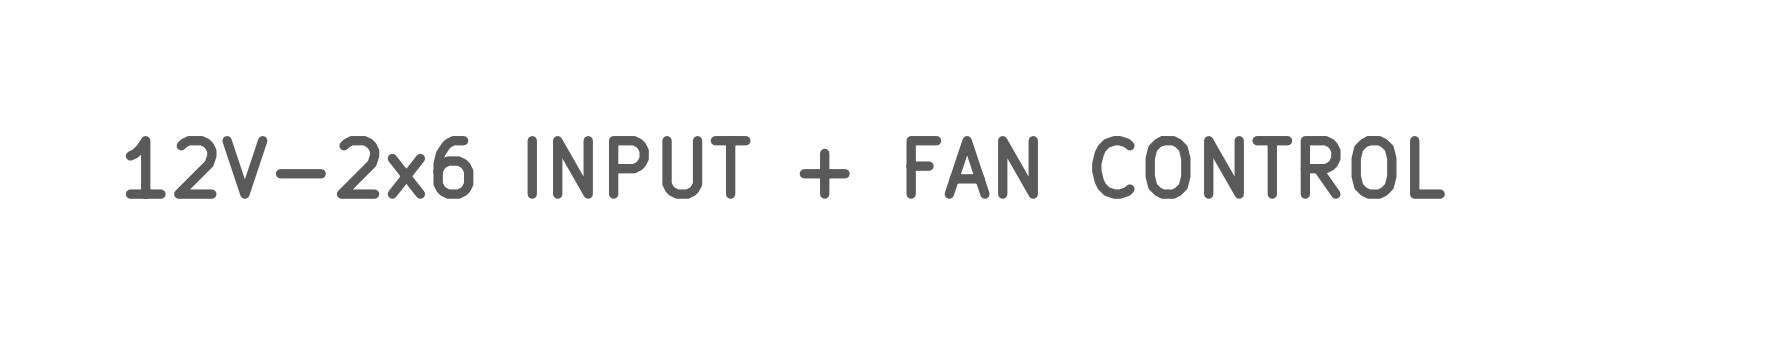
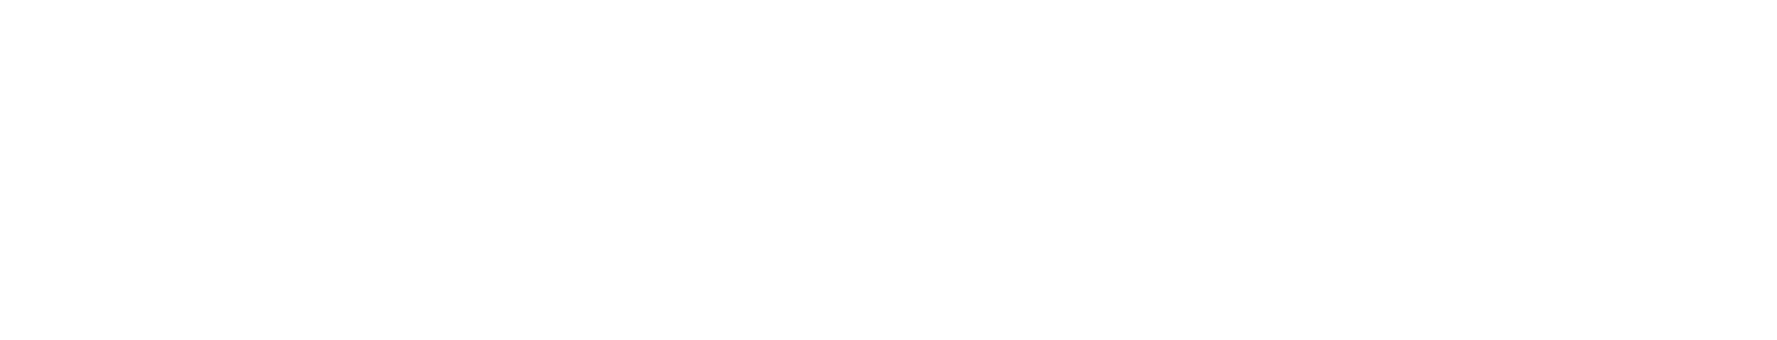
text: 12V-2x6 INPUT + FAN CONTROL (785, 167) -> none

